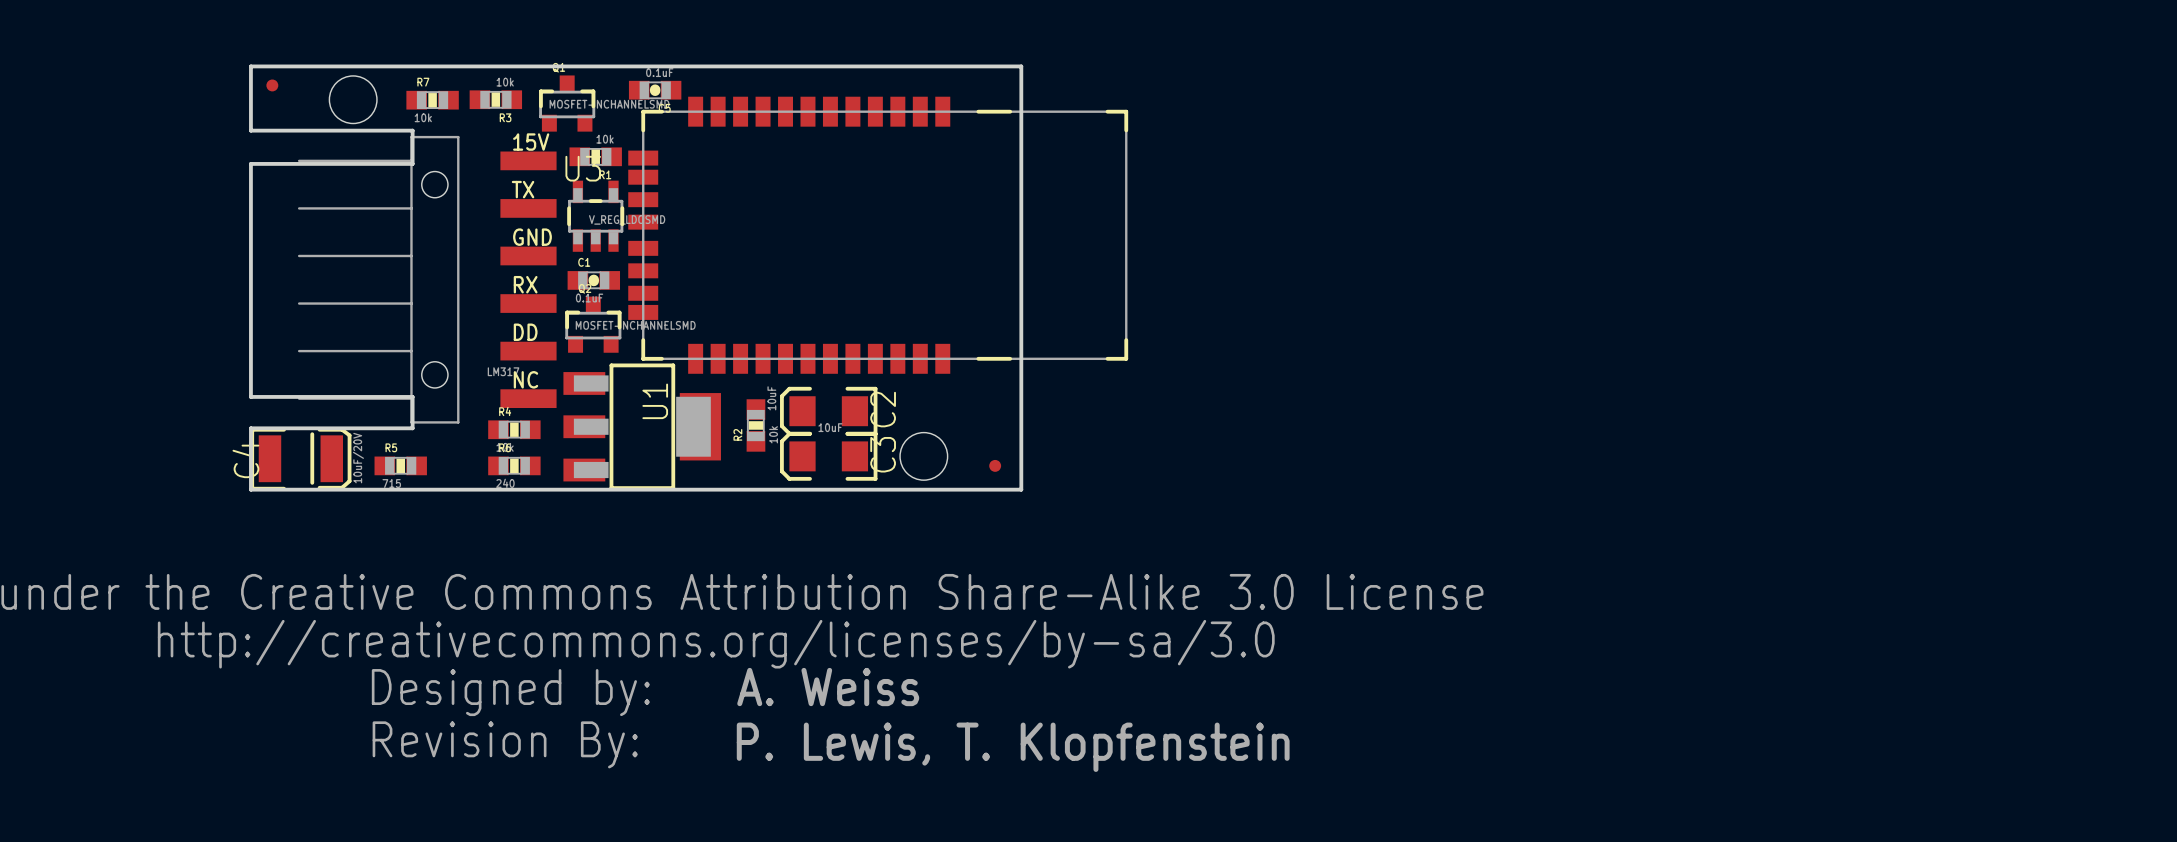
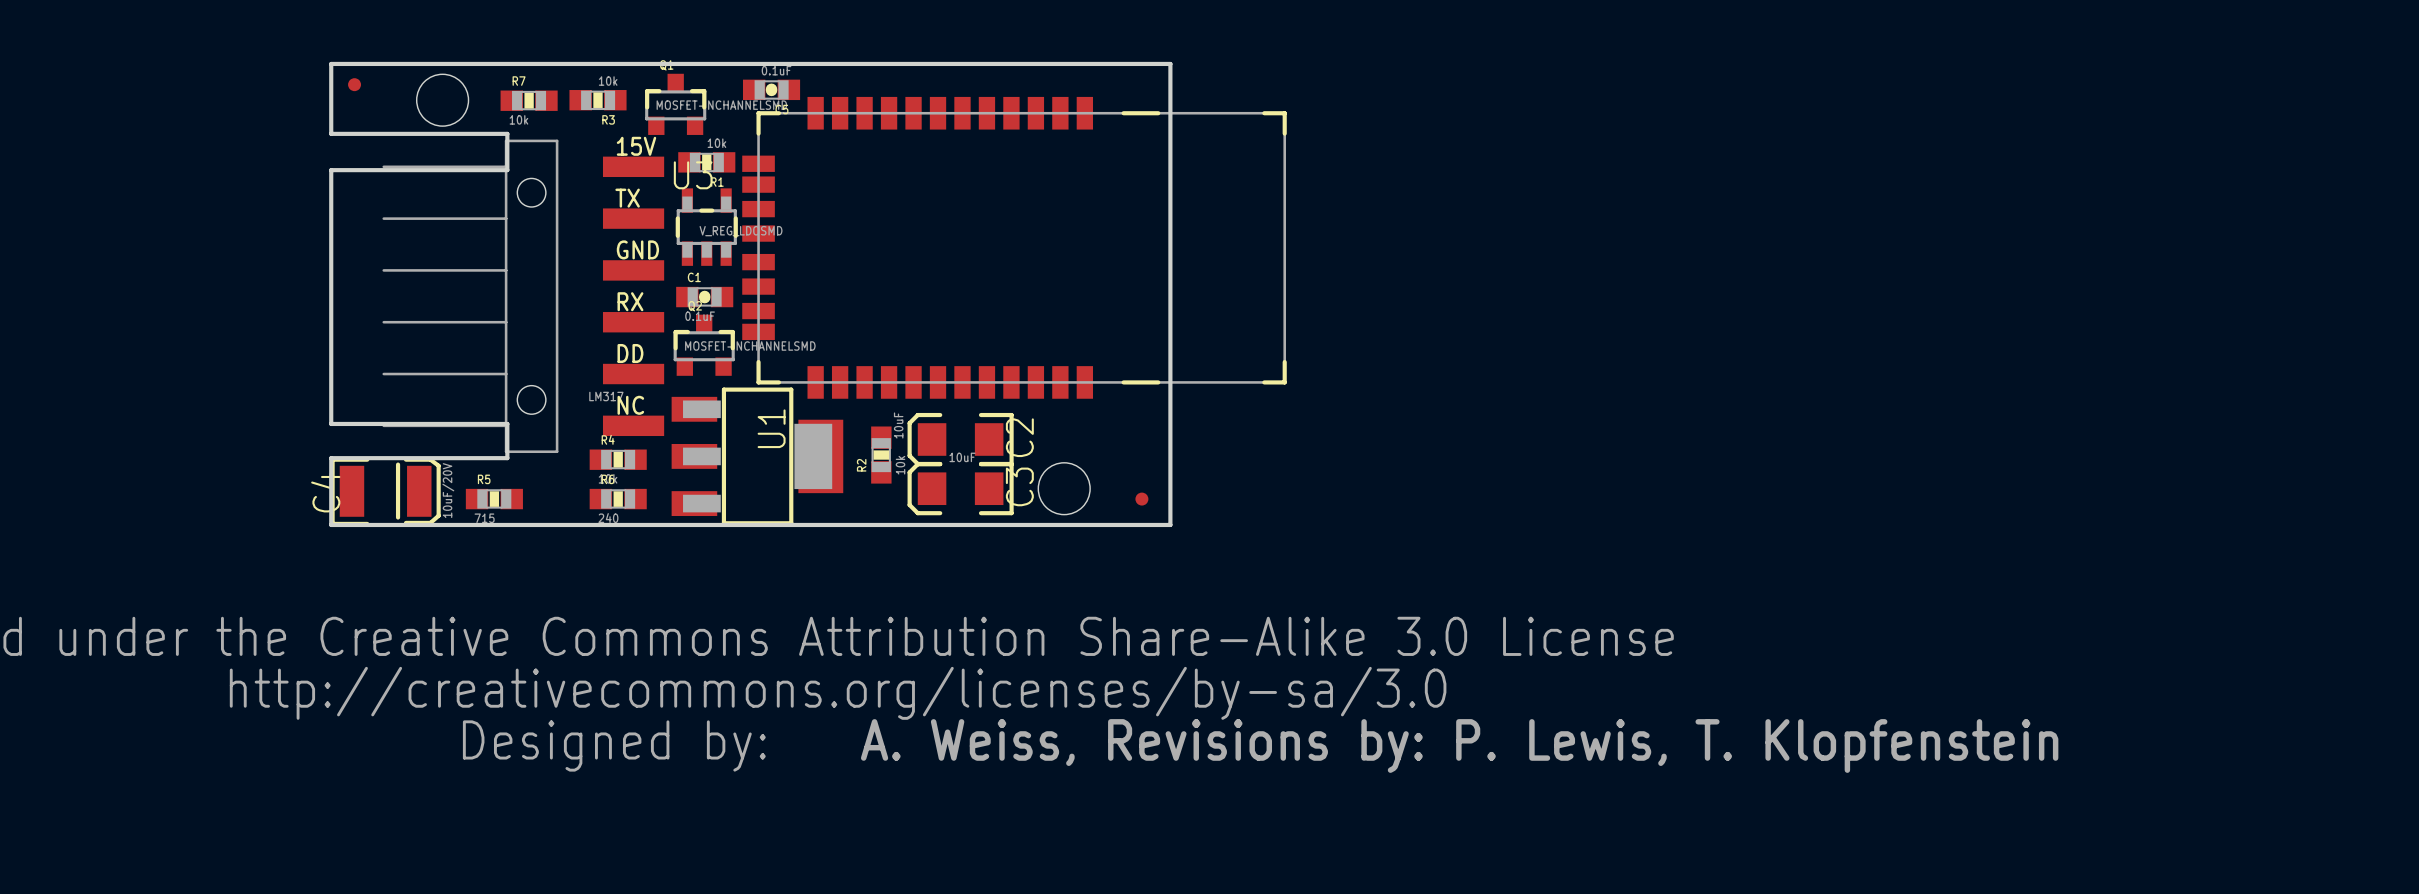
text: A. Weiss (828, 687) -> A. Weiss, Revisions by: P. Lewis, T. Klopfenstein (1459, 745)
drawing: [372, 721, 638, 769] -> none
text: P. Lewis, T. Klopfenstein (1013, 747) -> none

